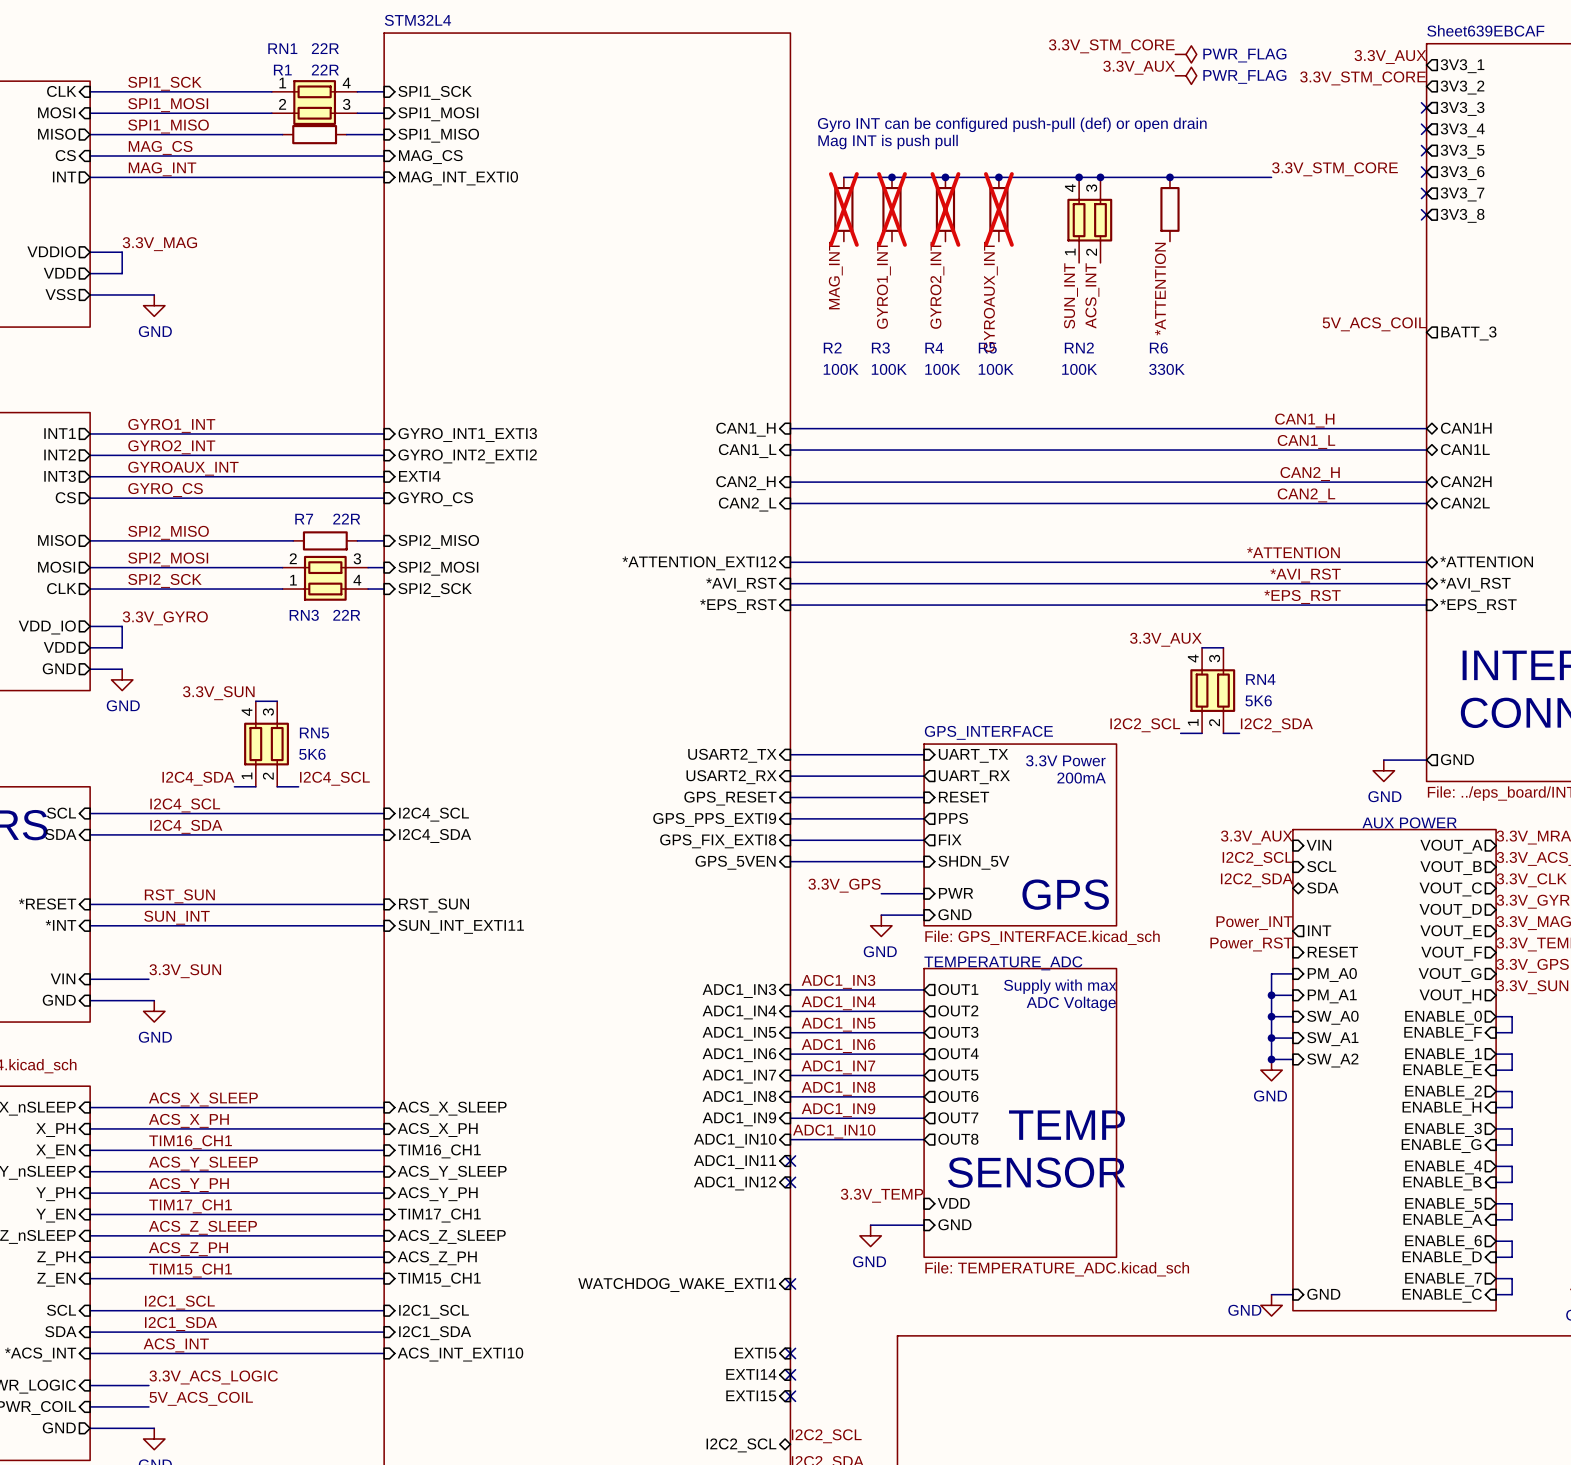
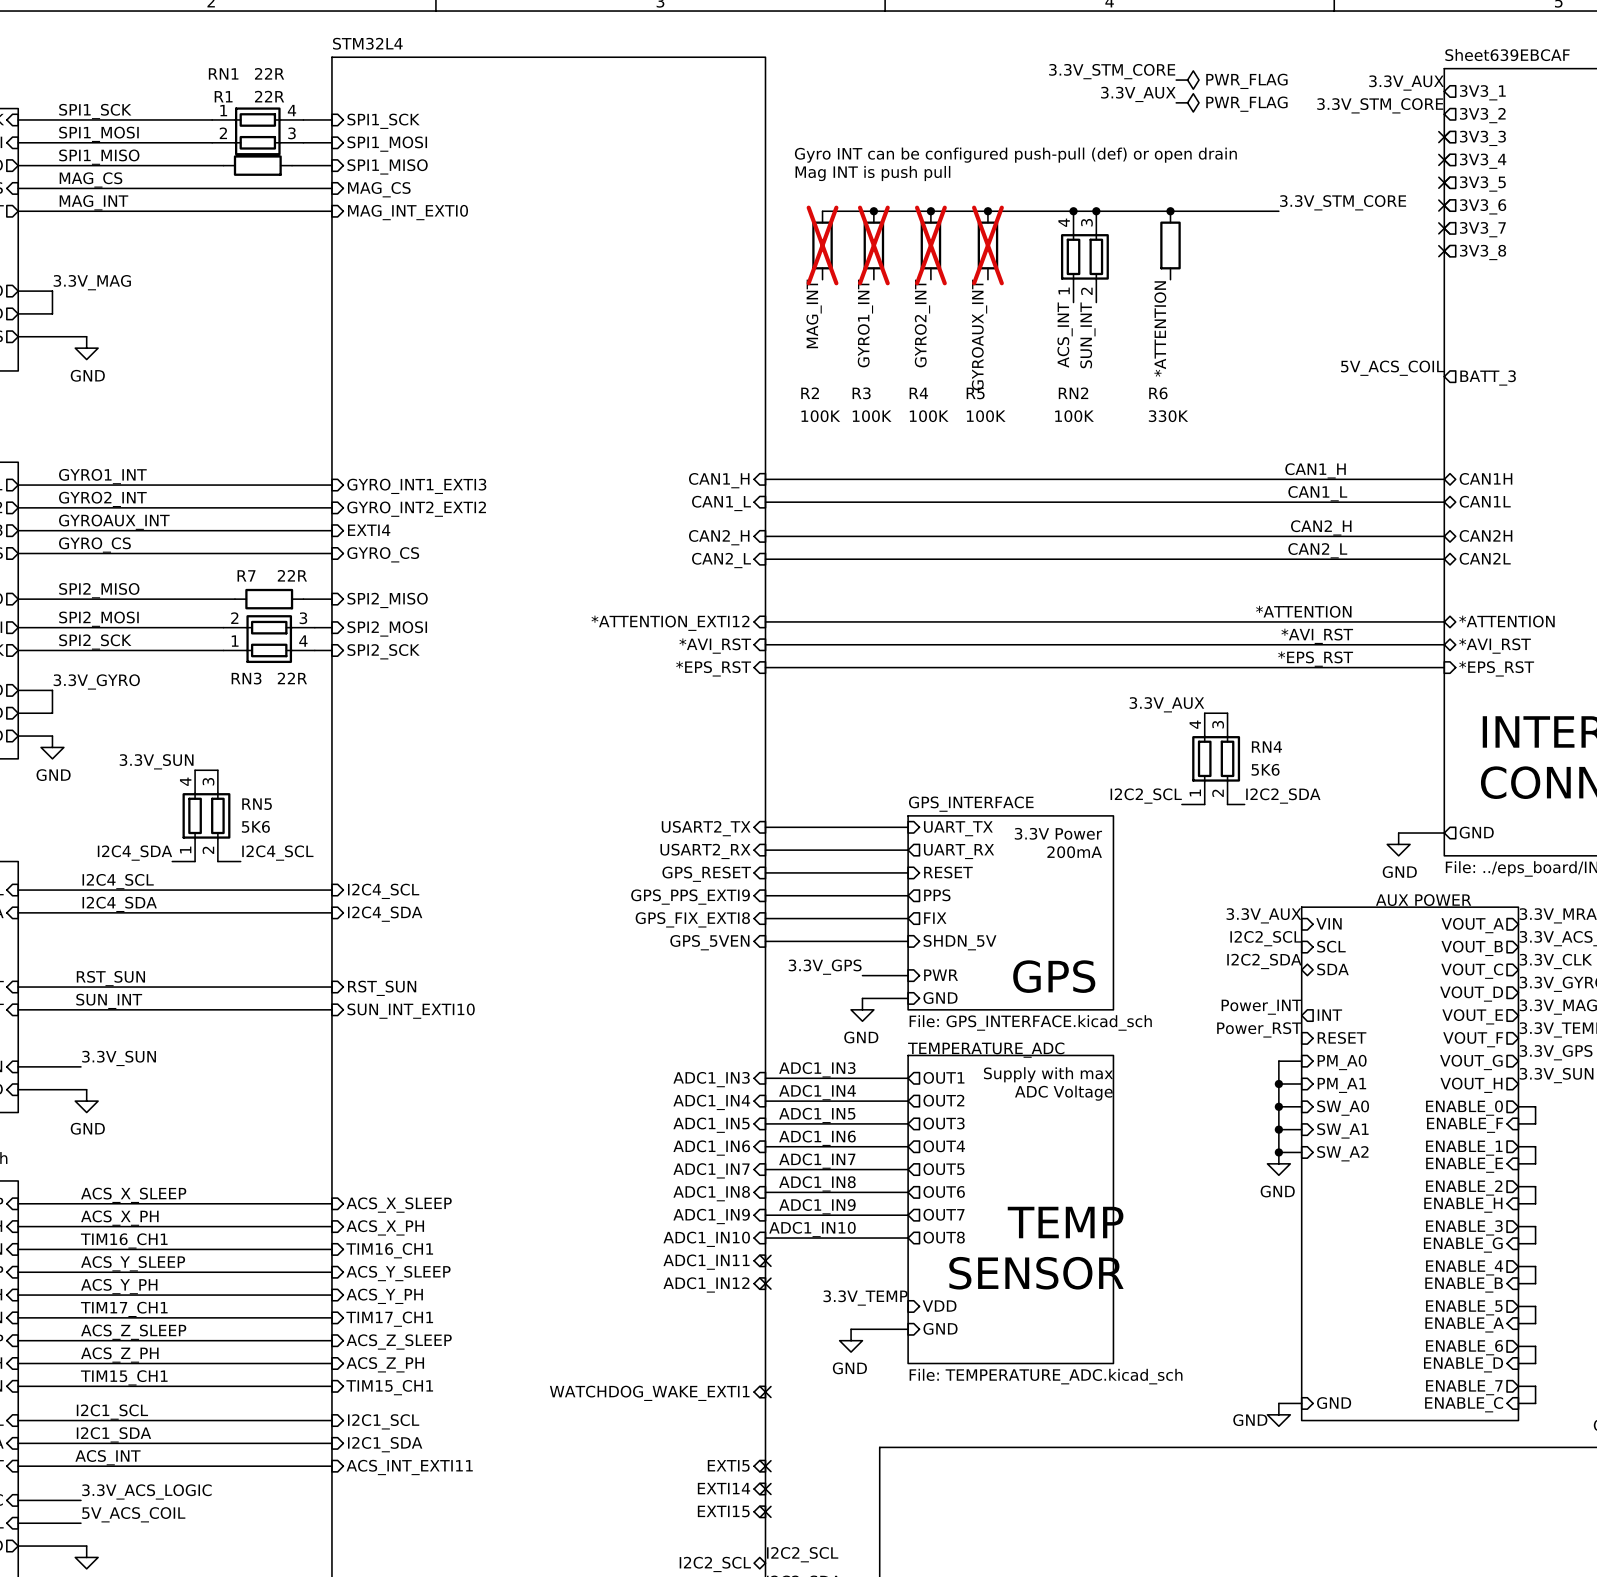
label: SUN_INT (1071, 295) -> ACS_INT (1065, 335)
label: ACS_INT (1092, 295) -> SUN_INT (1087, 335)
sheet pin: SUN_INT_EXTI11 (461, 926) -> SUN_INT_EXTI10 (411, 1011)
sheet pin: ACS_INT_EXTI10 (460, 1354) -> ACS_INT_EXTI11 (409, 1467)

